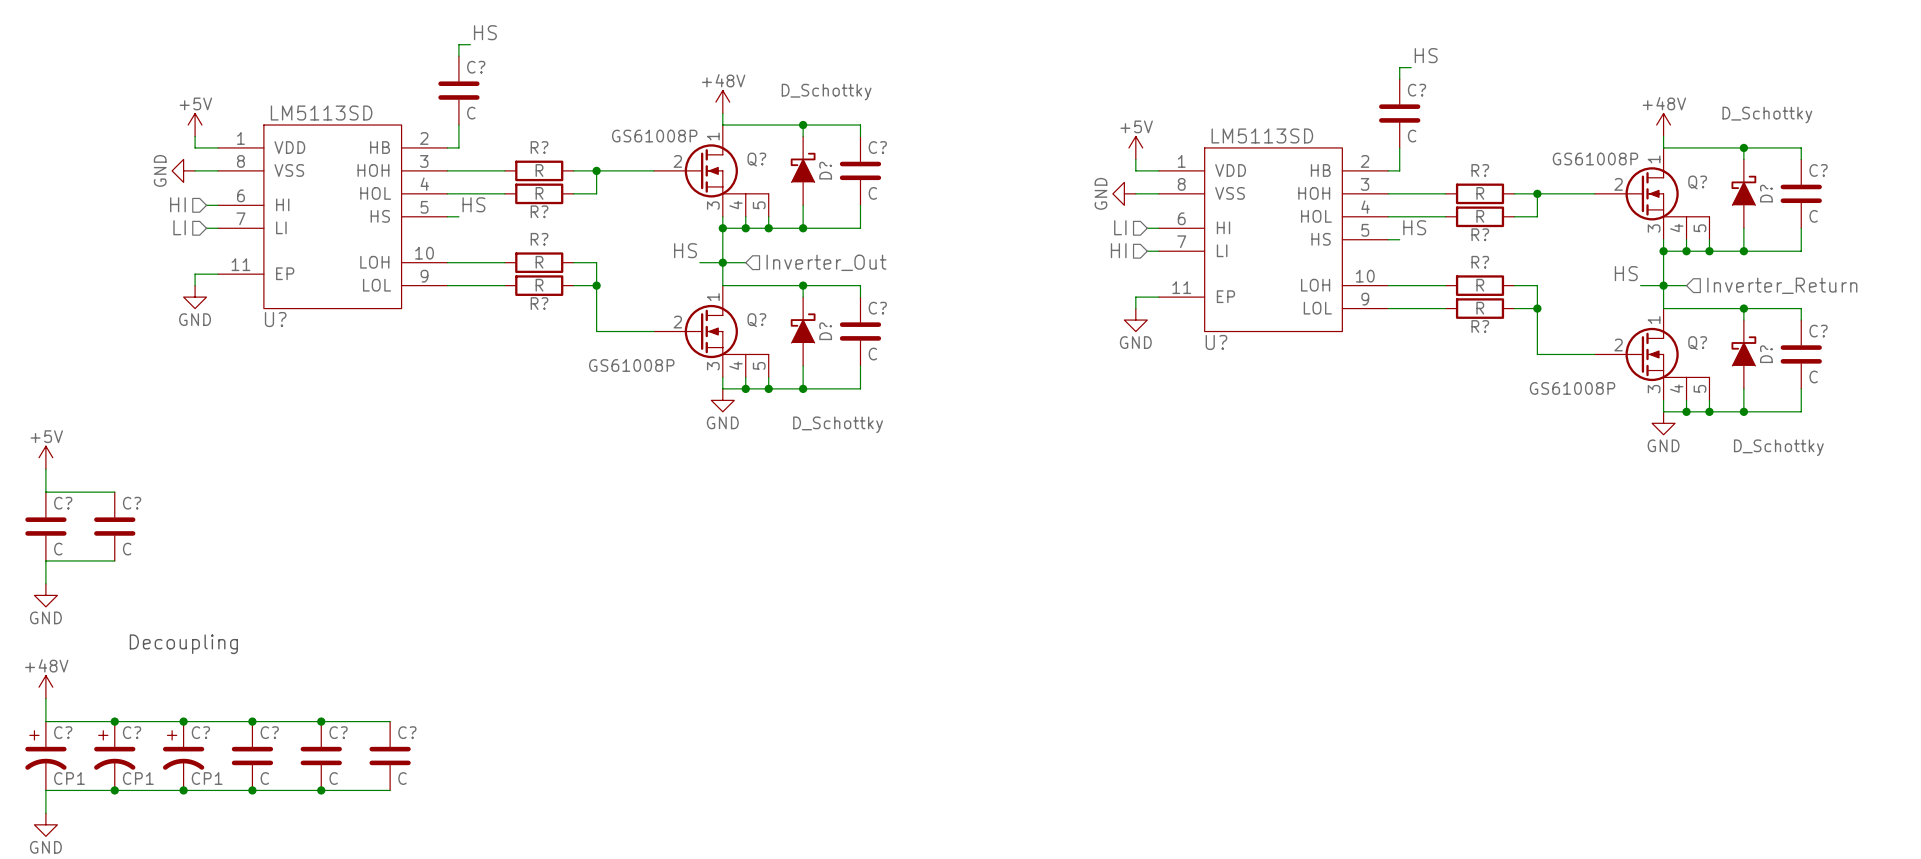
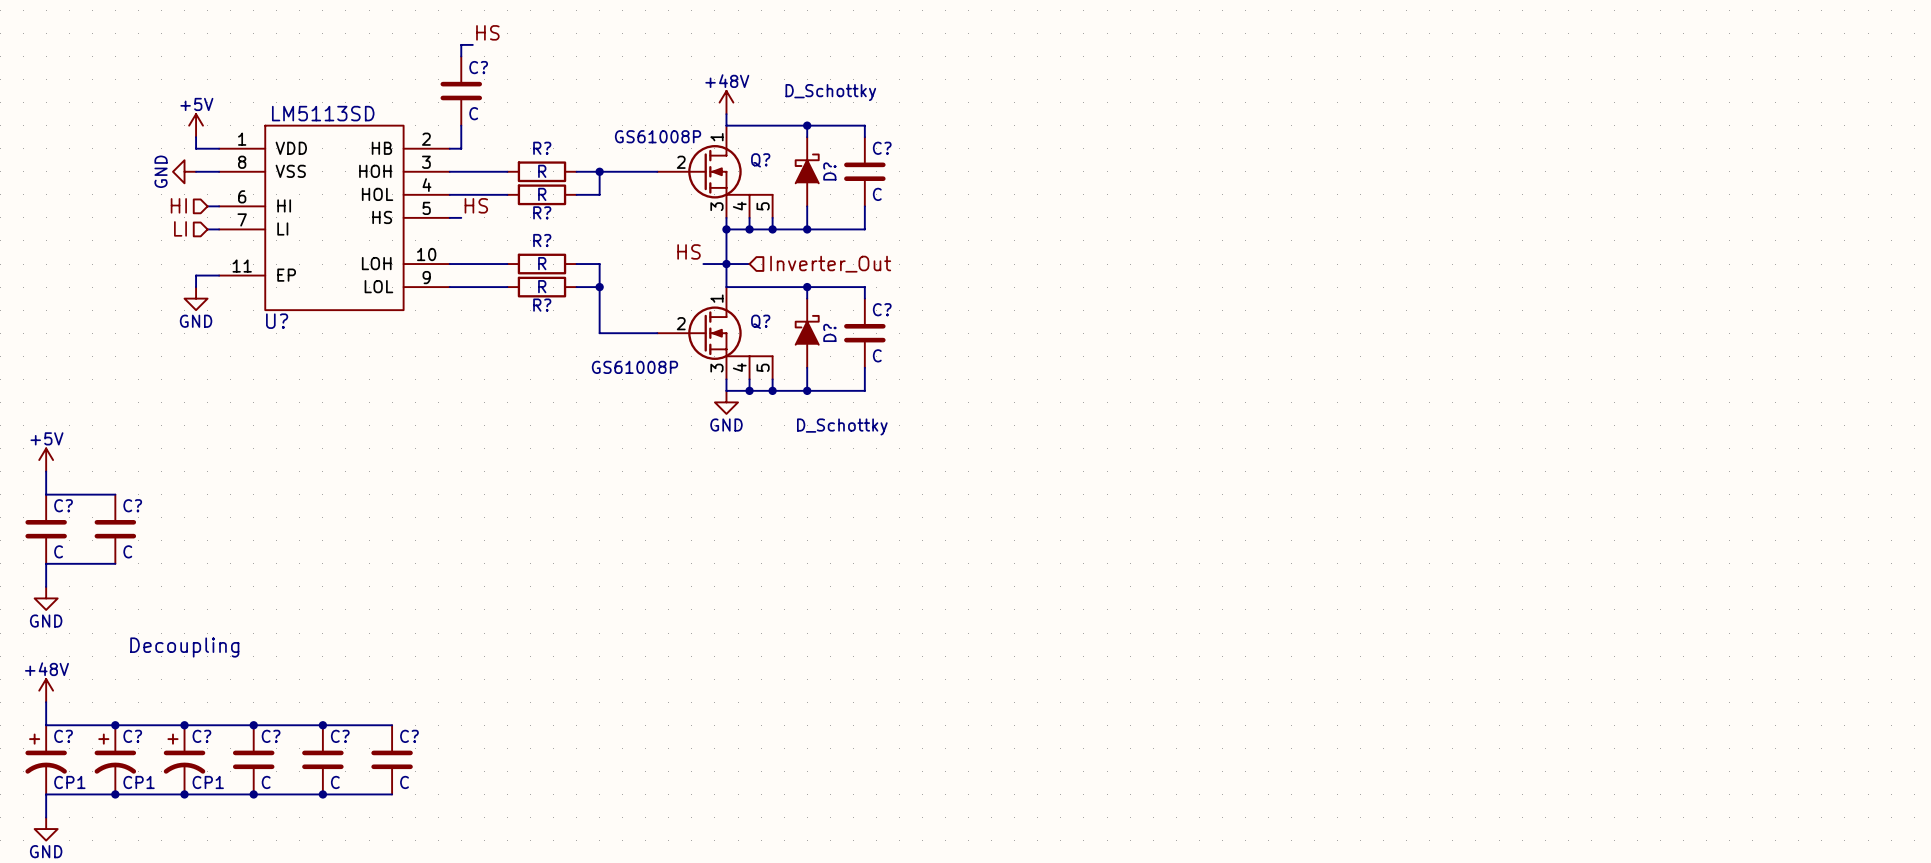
label: HS (1426, 55) -> none
wire: (1411, 67) (1399, 67) (1399, 79) -> none
C?: C (1399, 113) -> none
power symbol: +48V (1663, 125) -> none
wire: (1663, 136) (1663, 147) (1801, 147) (1801, 159) -> none
power symbol: +5V (1135, 147) -> none
wire: (1399, 147) (1399, 170) (1388, 170) -> none
wire: (1743, 147) (1743, 159) -> none
junction: (1743, 147) -> none
wire: (1135, 159) (1135, 170) (1158, 170) -> none
power symbol: GND (1124, 193) -> none
wire: (1135, 193) (1158, 193) -> none
wire: (1388, 193) (1445, 193) -> none
R?: R (1480, 193) -> none
wire: (1514, 193) (1594, 193) -> none
wire: (1537, 193) (1537, 216) (1514, 216) -> none
junction: (1537, 193) -> none
Q?: GS61008P (1652, 193) -> none
D?: D_Schottky (1743, 193) -> none
C?: C (1801, 193) -> none
wire: (1388, 216) (1445, 216) -> none
R?: R (1480, 216) -> none
hierarchical label: LI (1120, 227) -> none
label: HS (1414, 227) -> none
wire: (1147, 228) (1158, 228) -> none
wire: (1743, 228) (1743, 251) -> none
wire: (1801, 228) (1801, 251) (1663, 251) -> none
U?: LM5113SD (1273, 239) -> none
wire: (1388, 239) (1399, 239) -> none
wire: (1663, 239) (1663, 308) (1801, 308) (1801, 320) -> none
wire: (1686, 239) (1686, 251) -> none
wire: (1709, 239) (1709, 251) -> none
hierarchical label: HI (1118, 250) -> none
wire: (1147, 251) (1158, 251) -> none
junction: (1663, 251) -> none
junction: (1686, 251) -> none
junction: (1709, 251) -> none
junction: (1743, 251) -> none
label: HS (1626, 273) -> none
wire: (1388, 285) (1445, 285) -> none
R?: R (1480, 285) -> none
wire: (1514, 285) (1537, 285) (1537, 354) (1594, 354) -> none
wire: (1640, 285) (1686, 285) -> none
junction: (1663, 285) -> none
hierarchical label: Inverter_Return (1782, 285) -> none
wire: (1158, 297) (1135, 297) (1135, 308) -> none
wire: (1388, 308) (1445, 308) -> none
R?: R (1480, 308) -> none
wire: (1514, 308) (1537, 308) -> none
junction: (1537, 308) -> none
wire: (1743, 308) (1743, 320) -> none
junction: (1743, 308) -> none
power symbol: GND (1135, 320) -> none
Q?: GS61008P (1652, 354) -> none
D?: D_Schottky (1743, 354) -> none
C?: C (1801, 354) -> none
wire: (1743, 388) (1743, 411) -> none
wire: (1801, 388) (1801, 411) (1663, 411) (1663, 400) -> none
wire: (1686, 400) (1686, 411) -> none
wire: (1709, 400) (1709, 411) -> none
junction: (1686, 411) -> none
junction: (1709, 411) -> none
junction: (1743, 411) -> none
power symbol: GND (1663, 423) -> none

